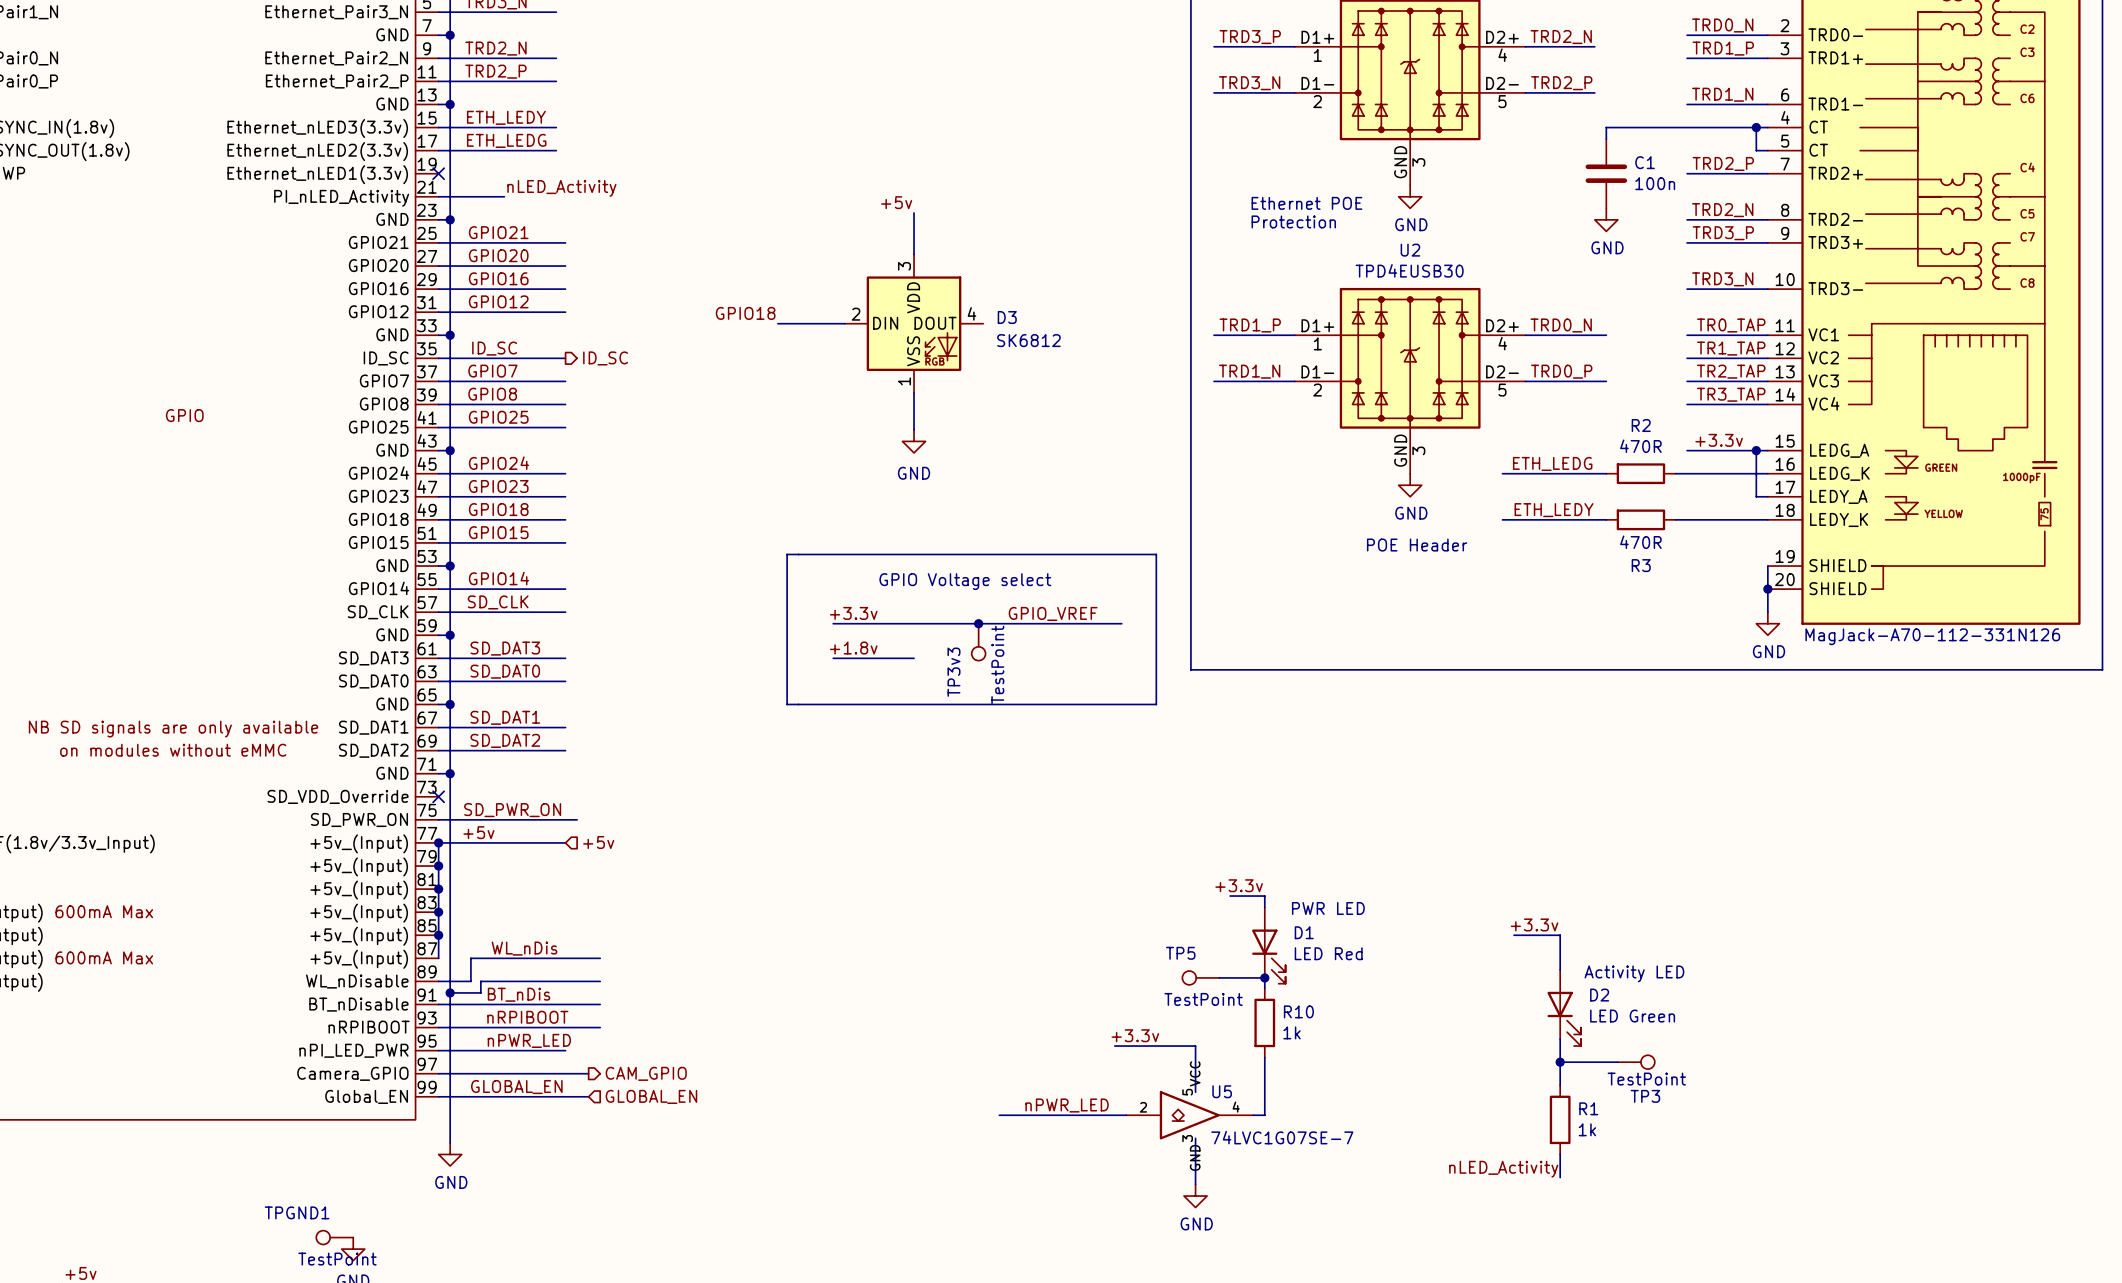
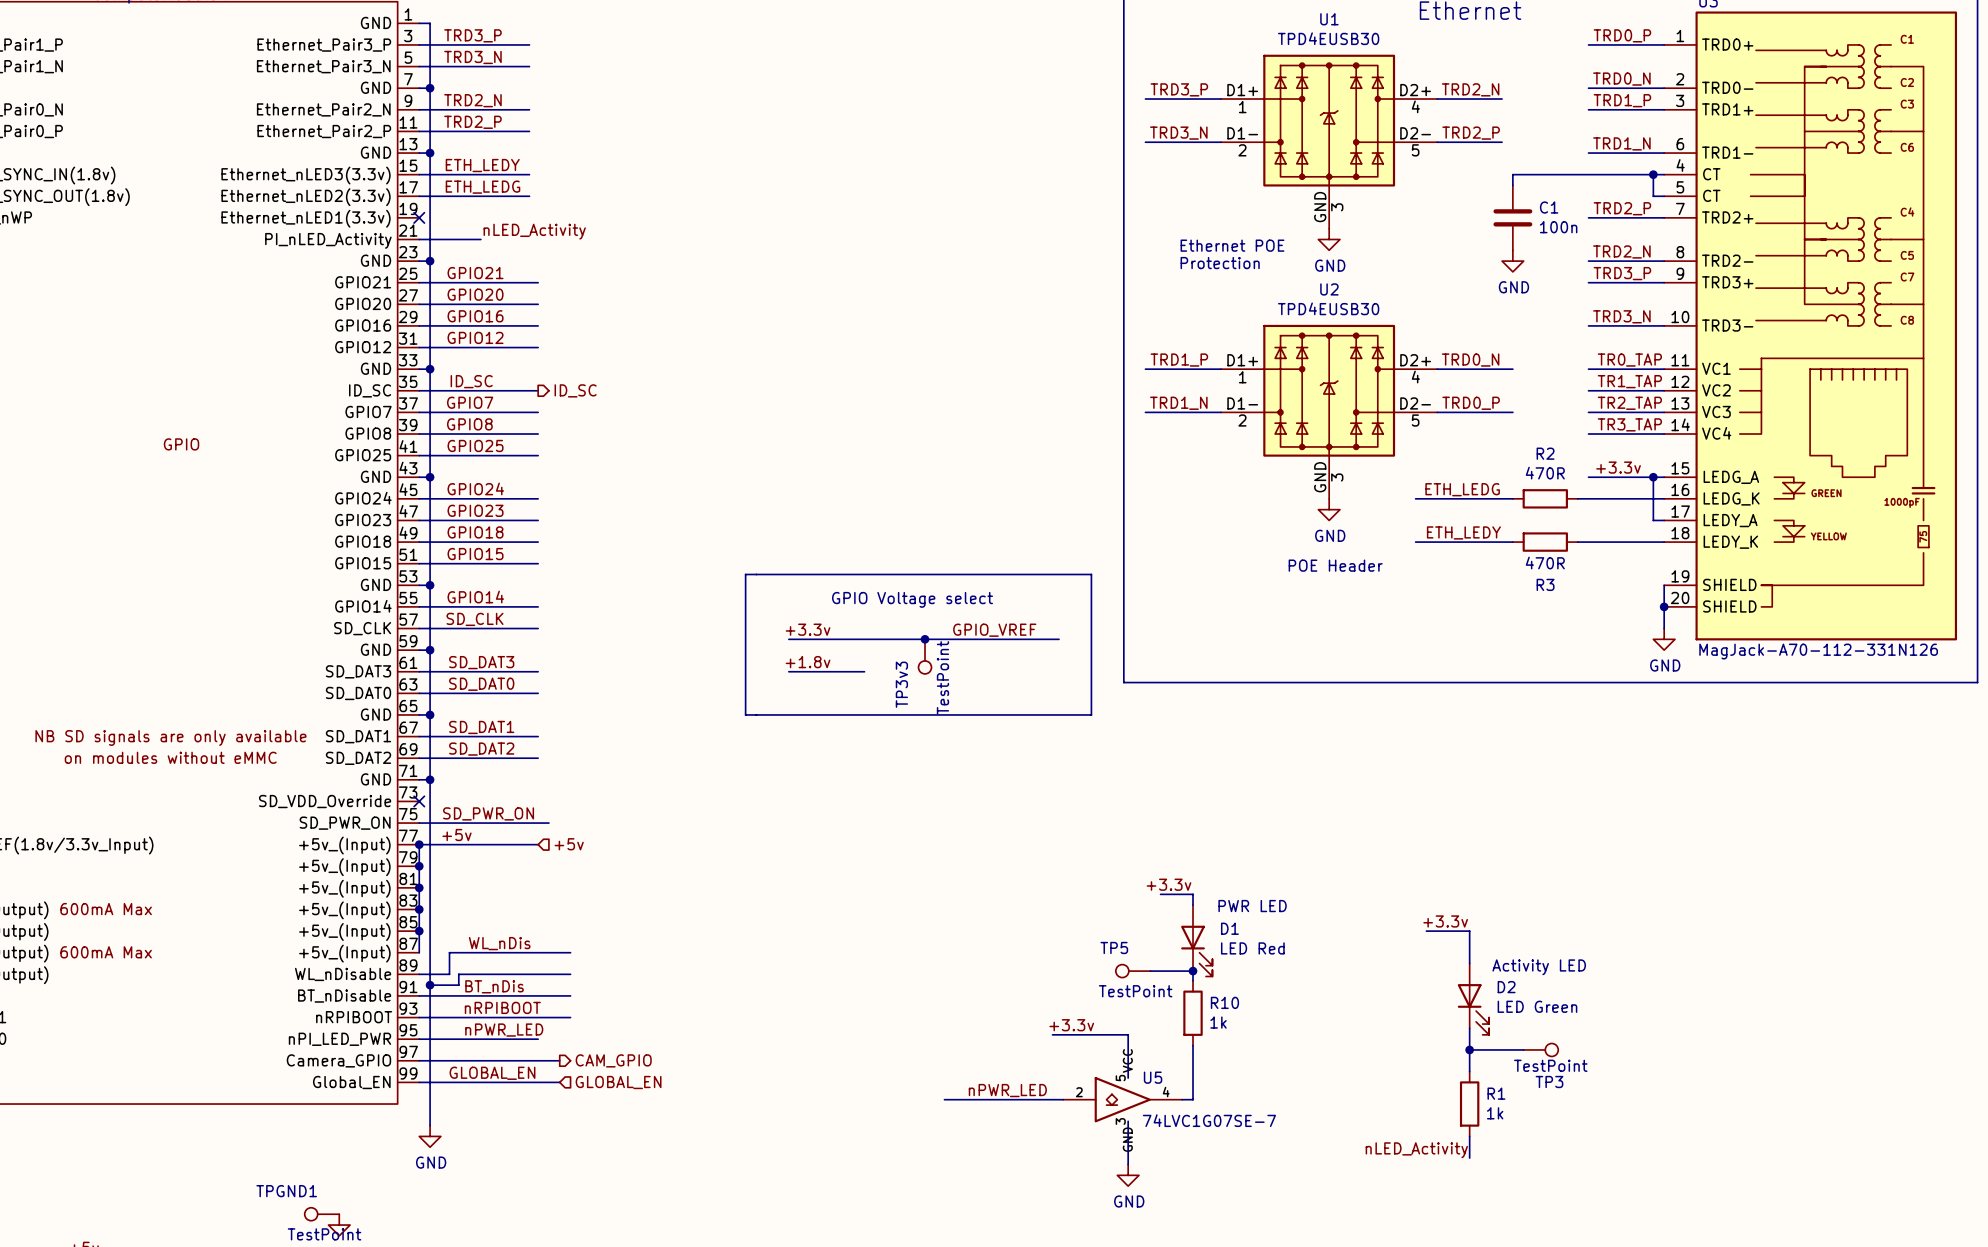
label: +5v (896, 202) -> none
wire: (914, 212) (914, 254) -> none
label: GPIO18 (745, 313) -> none
wire: (777, 323) (844, 323) -> none
D3: SK6812 (914, 323) -> none
wire: (914, 392) (914, 429) -> none
power symbol: GND (914, 441) -> none

